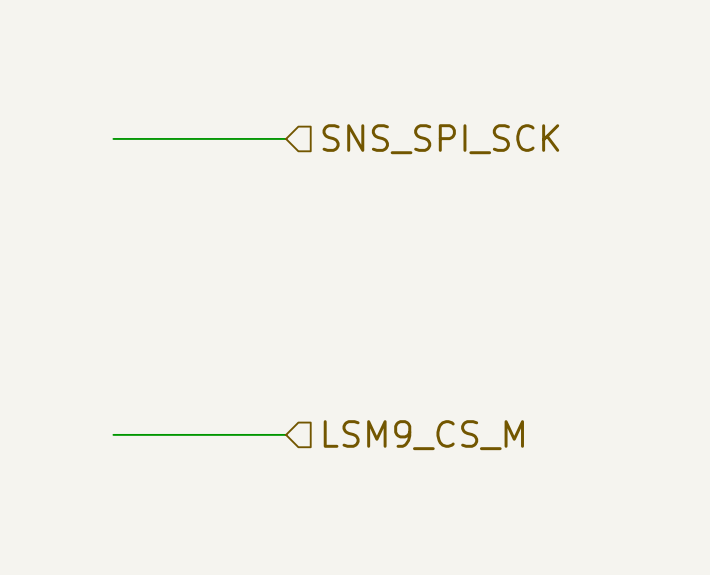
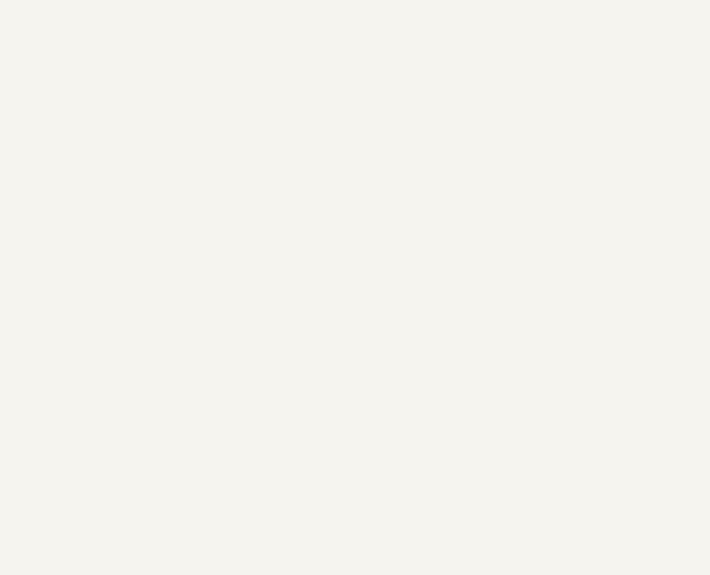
wire: (113, 138) (286, 138) -> none
hierarchical label: SNS_SPI_SCK (440, 139) -> none
wire: (113, 434) (286, 434) -> none
hierarchical label: LSM9_CS_M (423, 435) -> none

